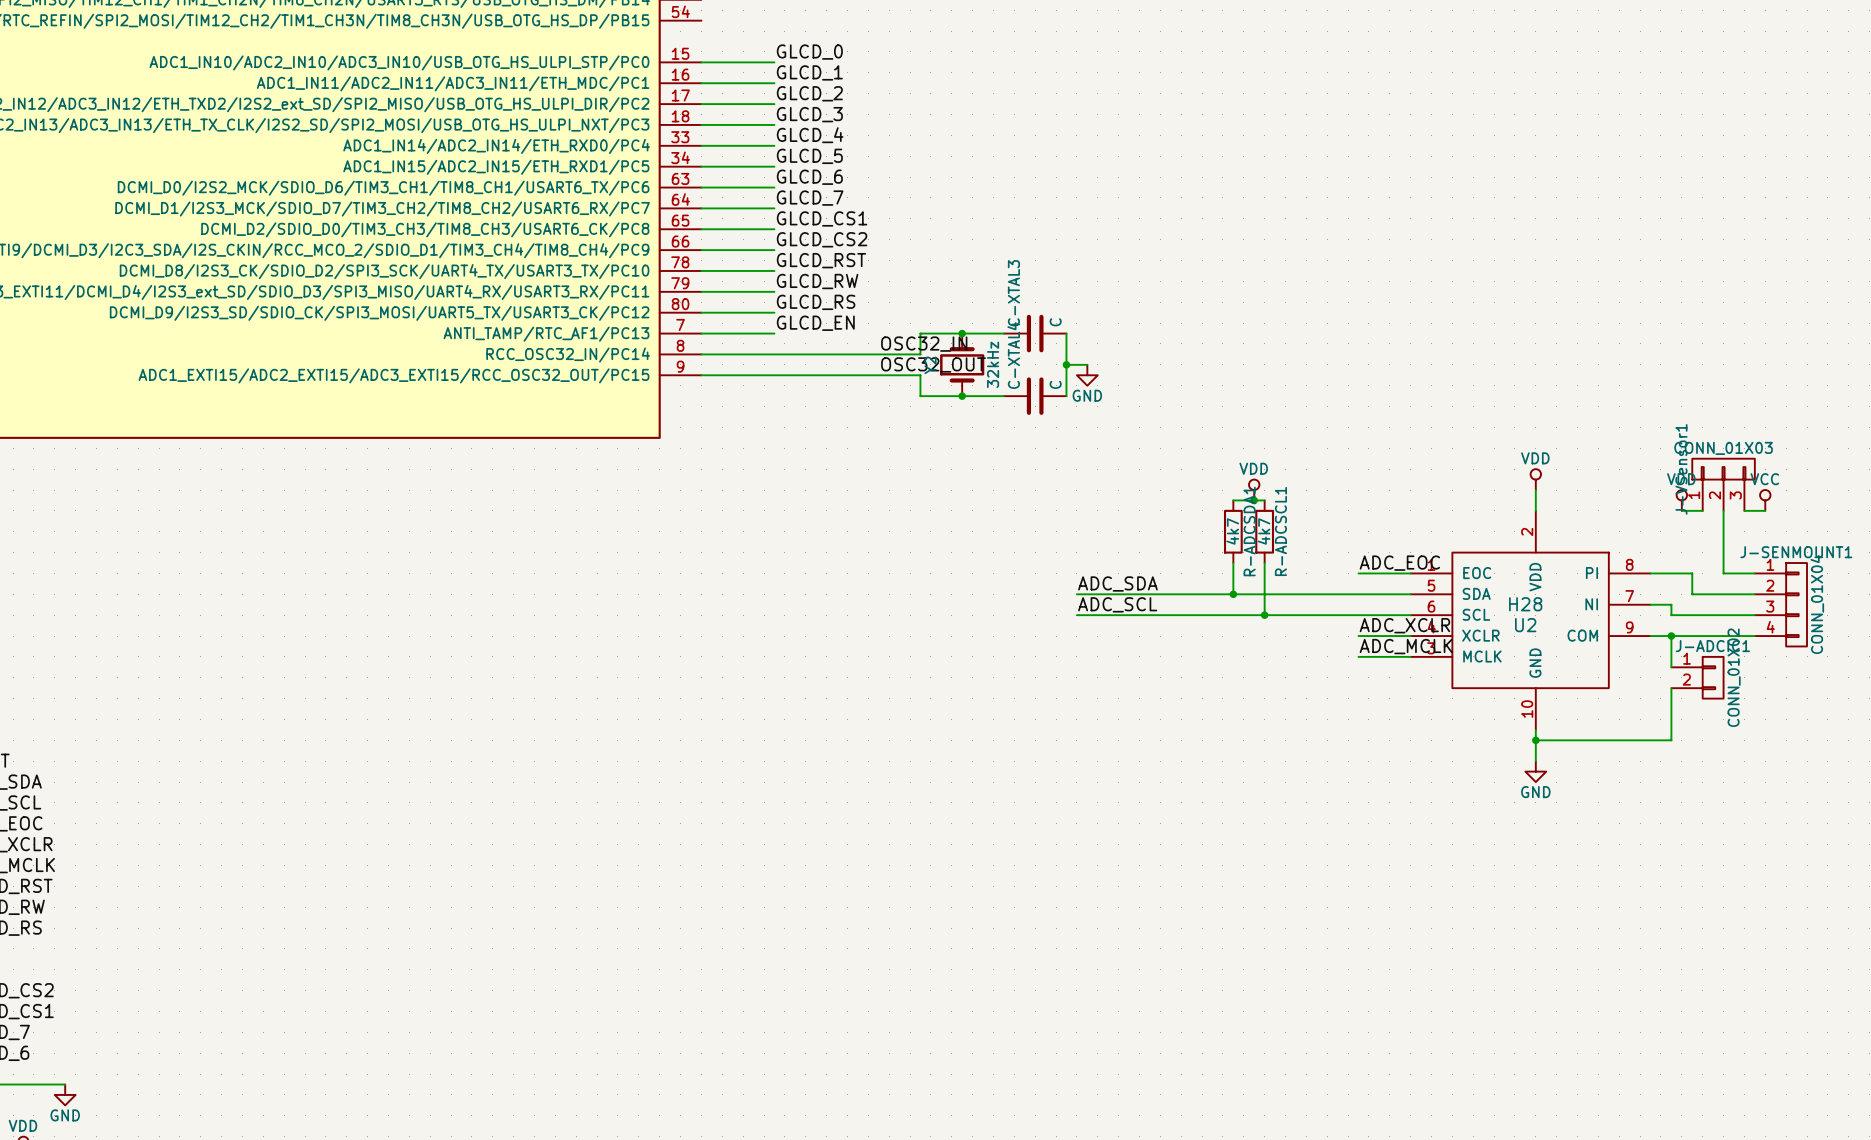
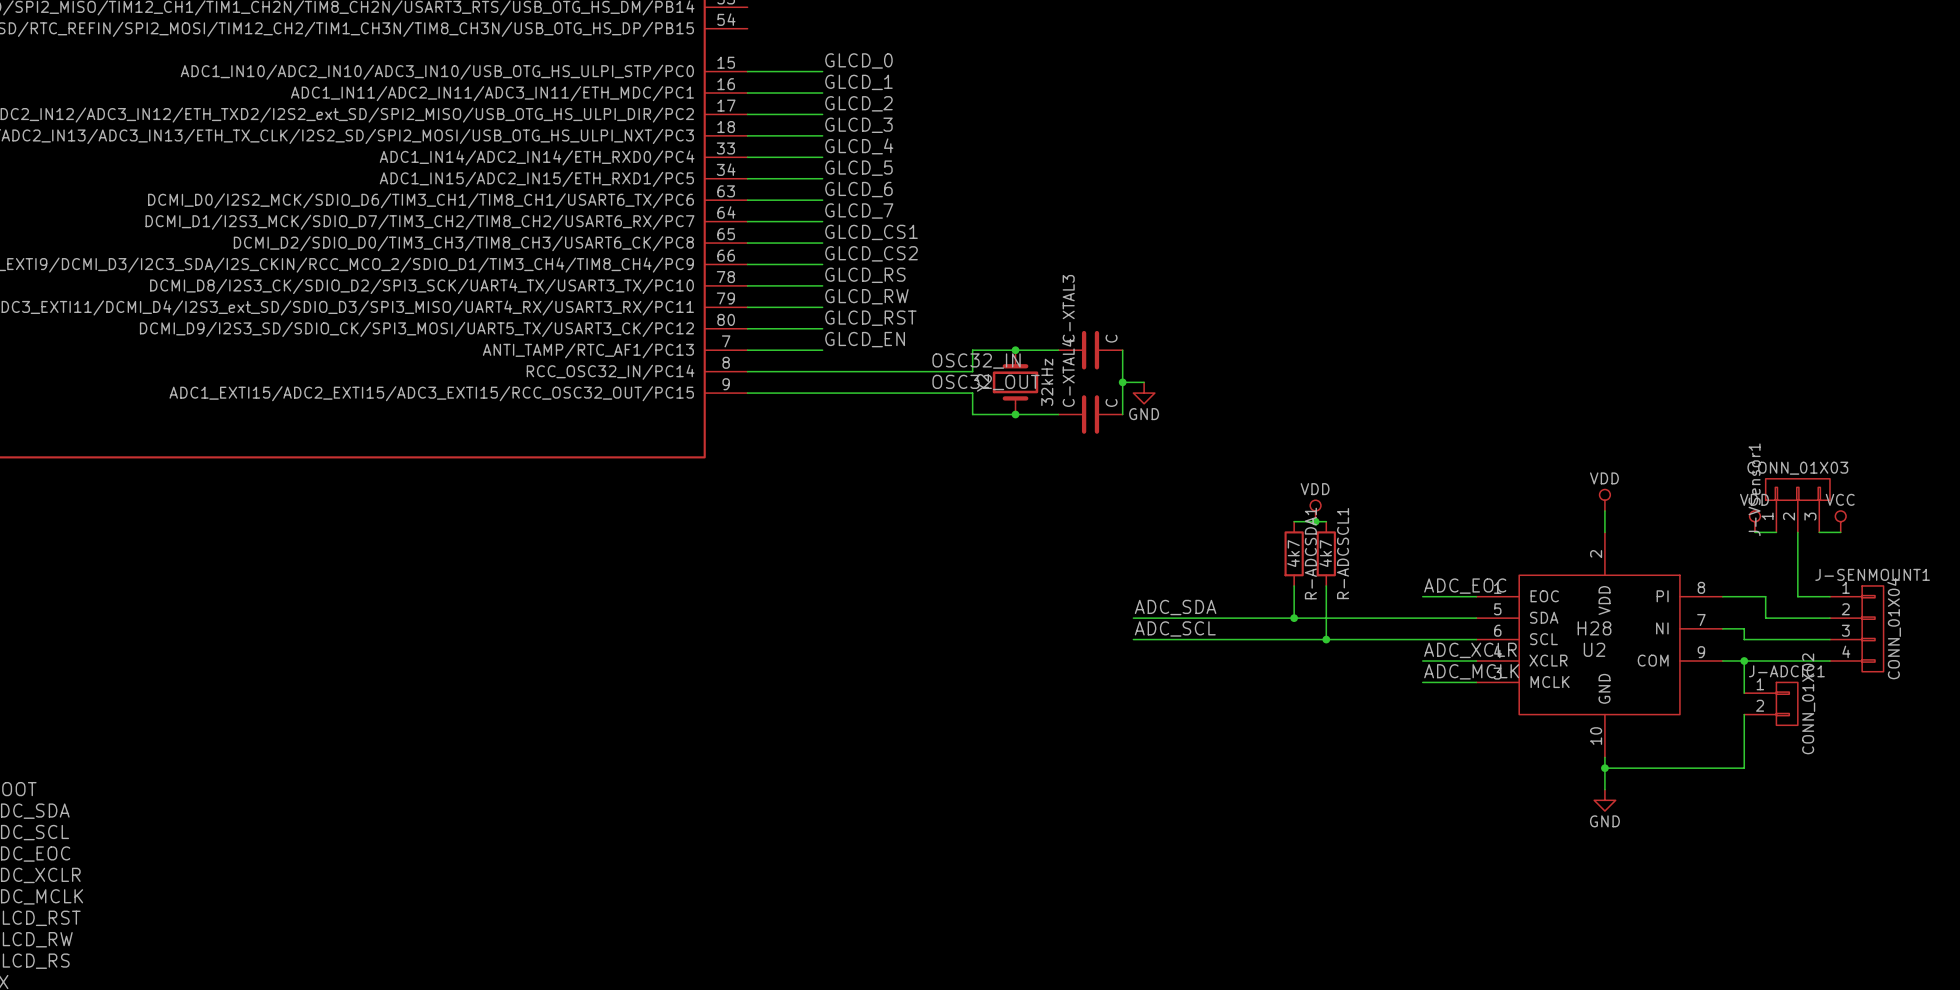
label: GLCD_RST (821, 260) -> GLCD_RS (865, 275)
label: GLCD_RS (816, 302) -> GLCD_RST (870, 318)

